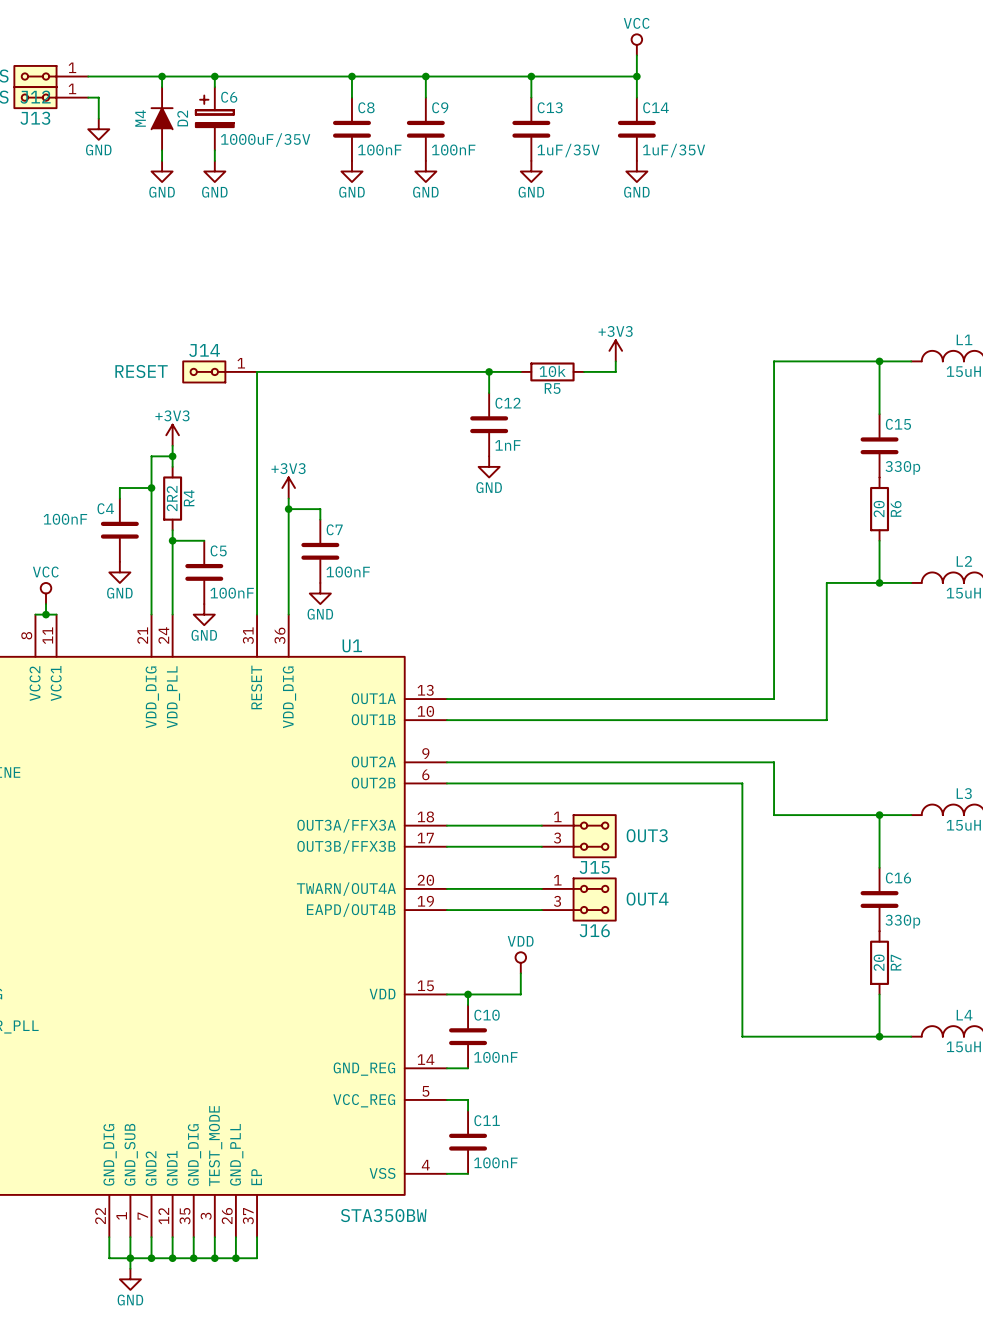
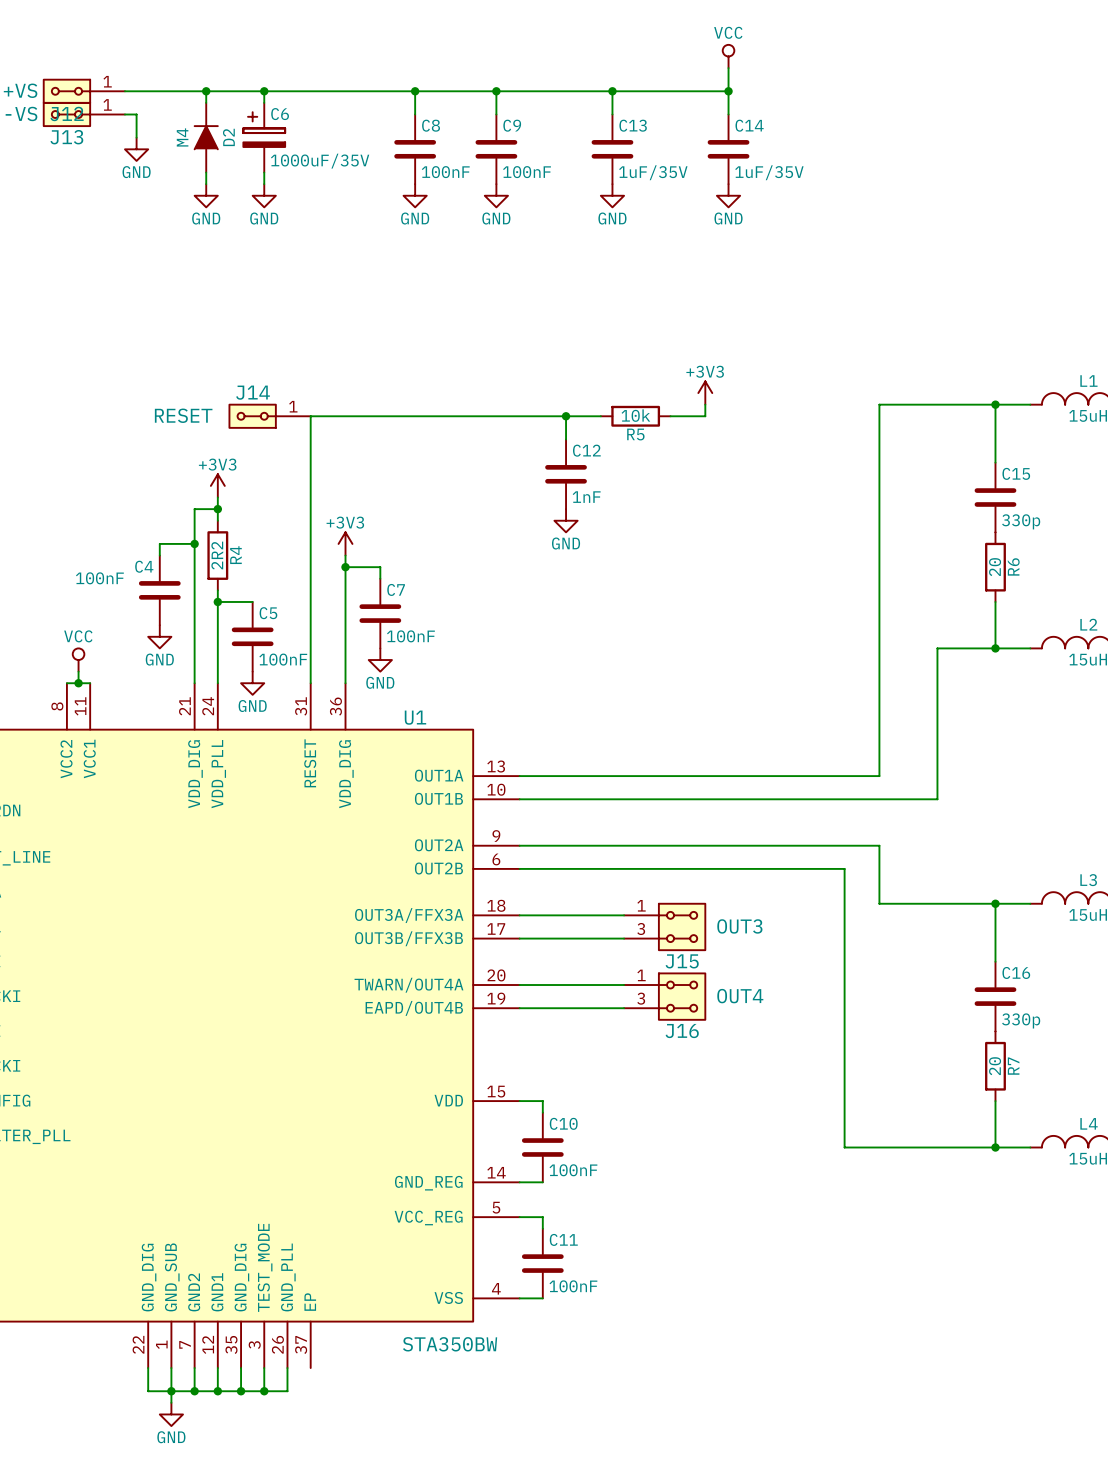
power symbol: VDD (520, 962) -> none
wire: (520, 973) (520, 994) (468, 994) -> none
junction: (468, 994) -> none
wire: (257, 1237) (257, 1258) (235, 1258) -> none
junction: (235, 1258) -> none

